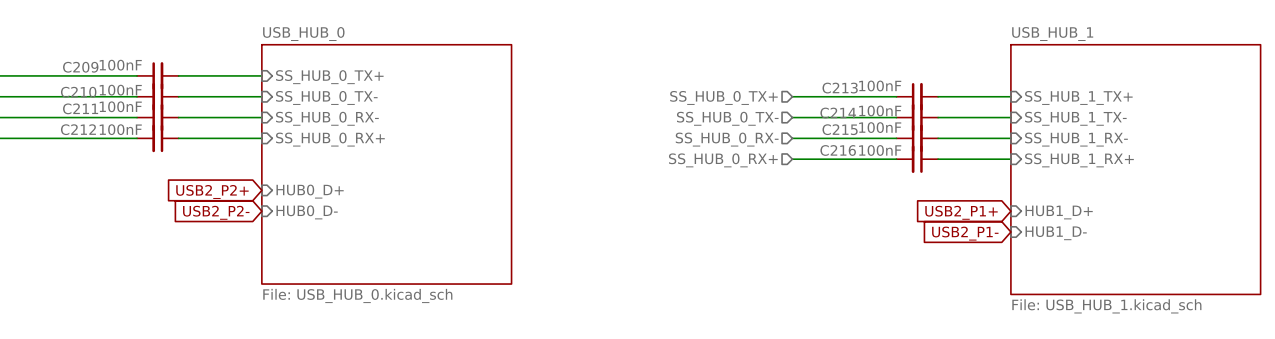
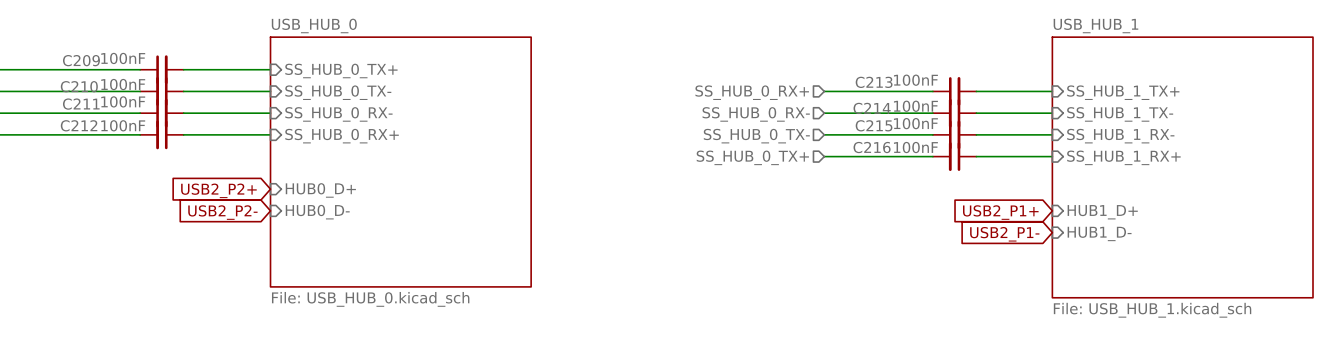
hierarchical label: SS_HUB_0_TX+ (723, 97) -> SS_HUB_0_RX+ (752, 92)
hierarchical label: SS_HUB_0_TX- (727, 118) -> SS_HUB_0_RX- (756, 114)
hierarchical label: SS_HUB_0_RX- (727, 139) -> SS_HUB_0_TX- (756, 136)
hierarchical label: SS_HUB_0_RX+ (723, 160) -> SS_HUB_0_TX+ (752, 157)

